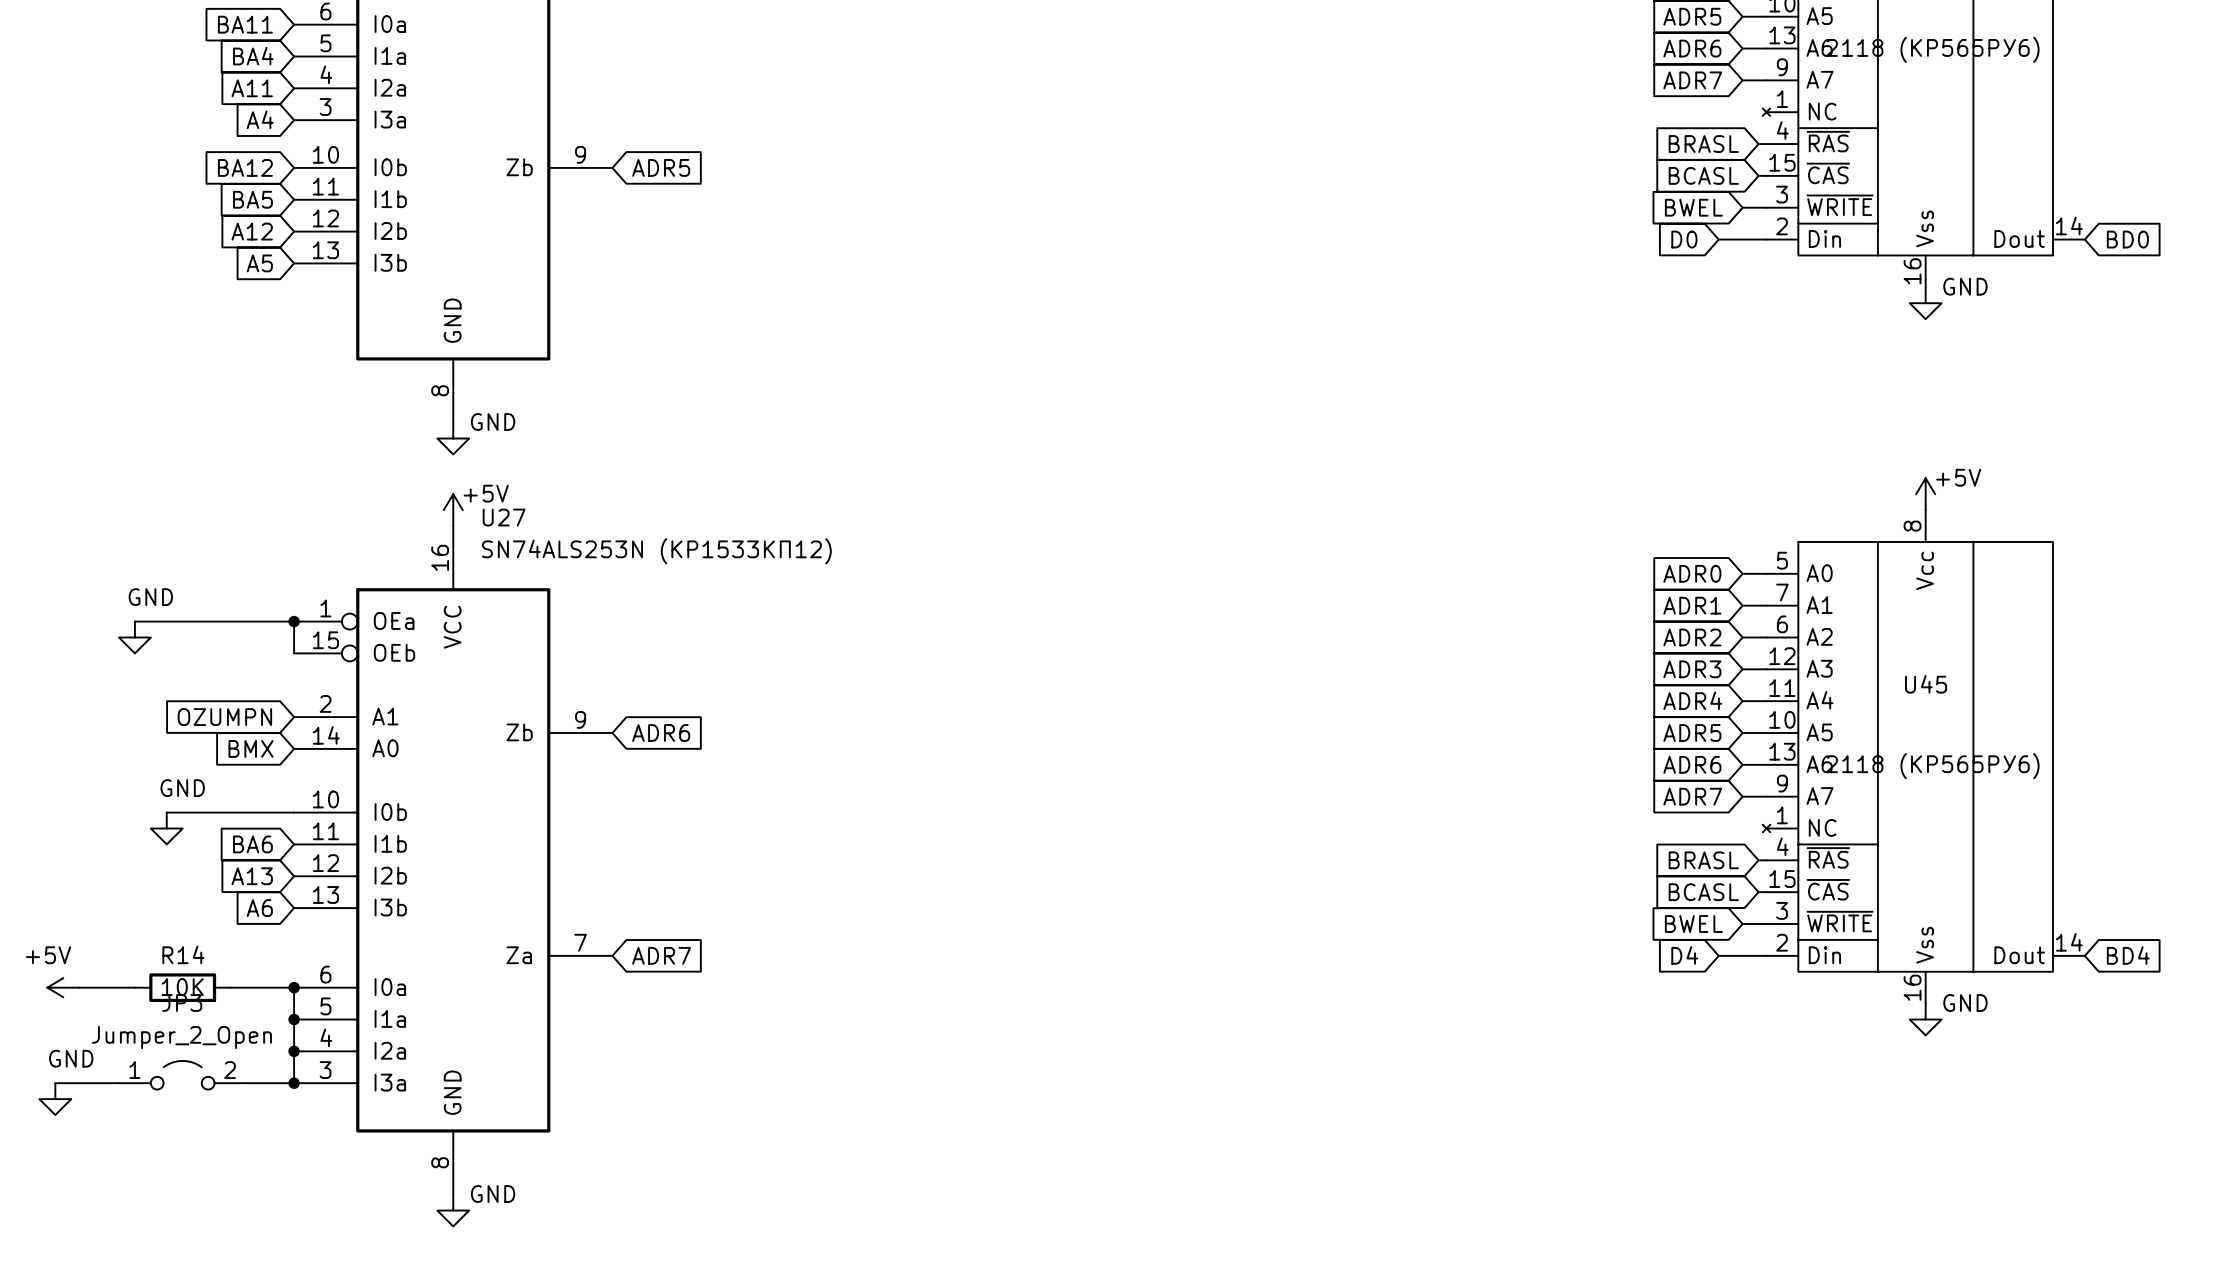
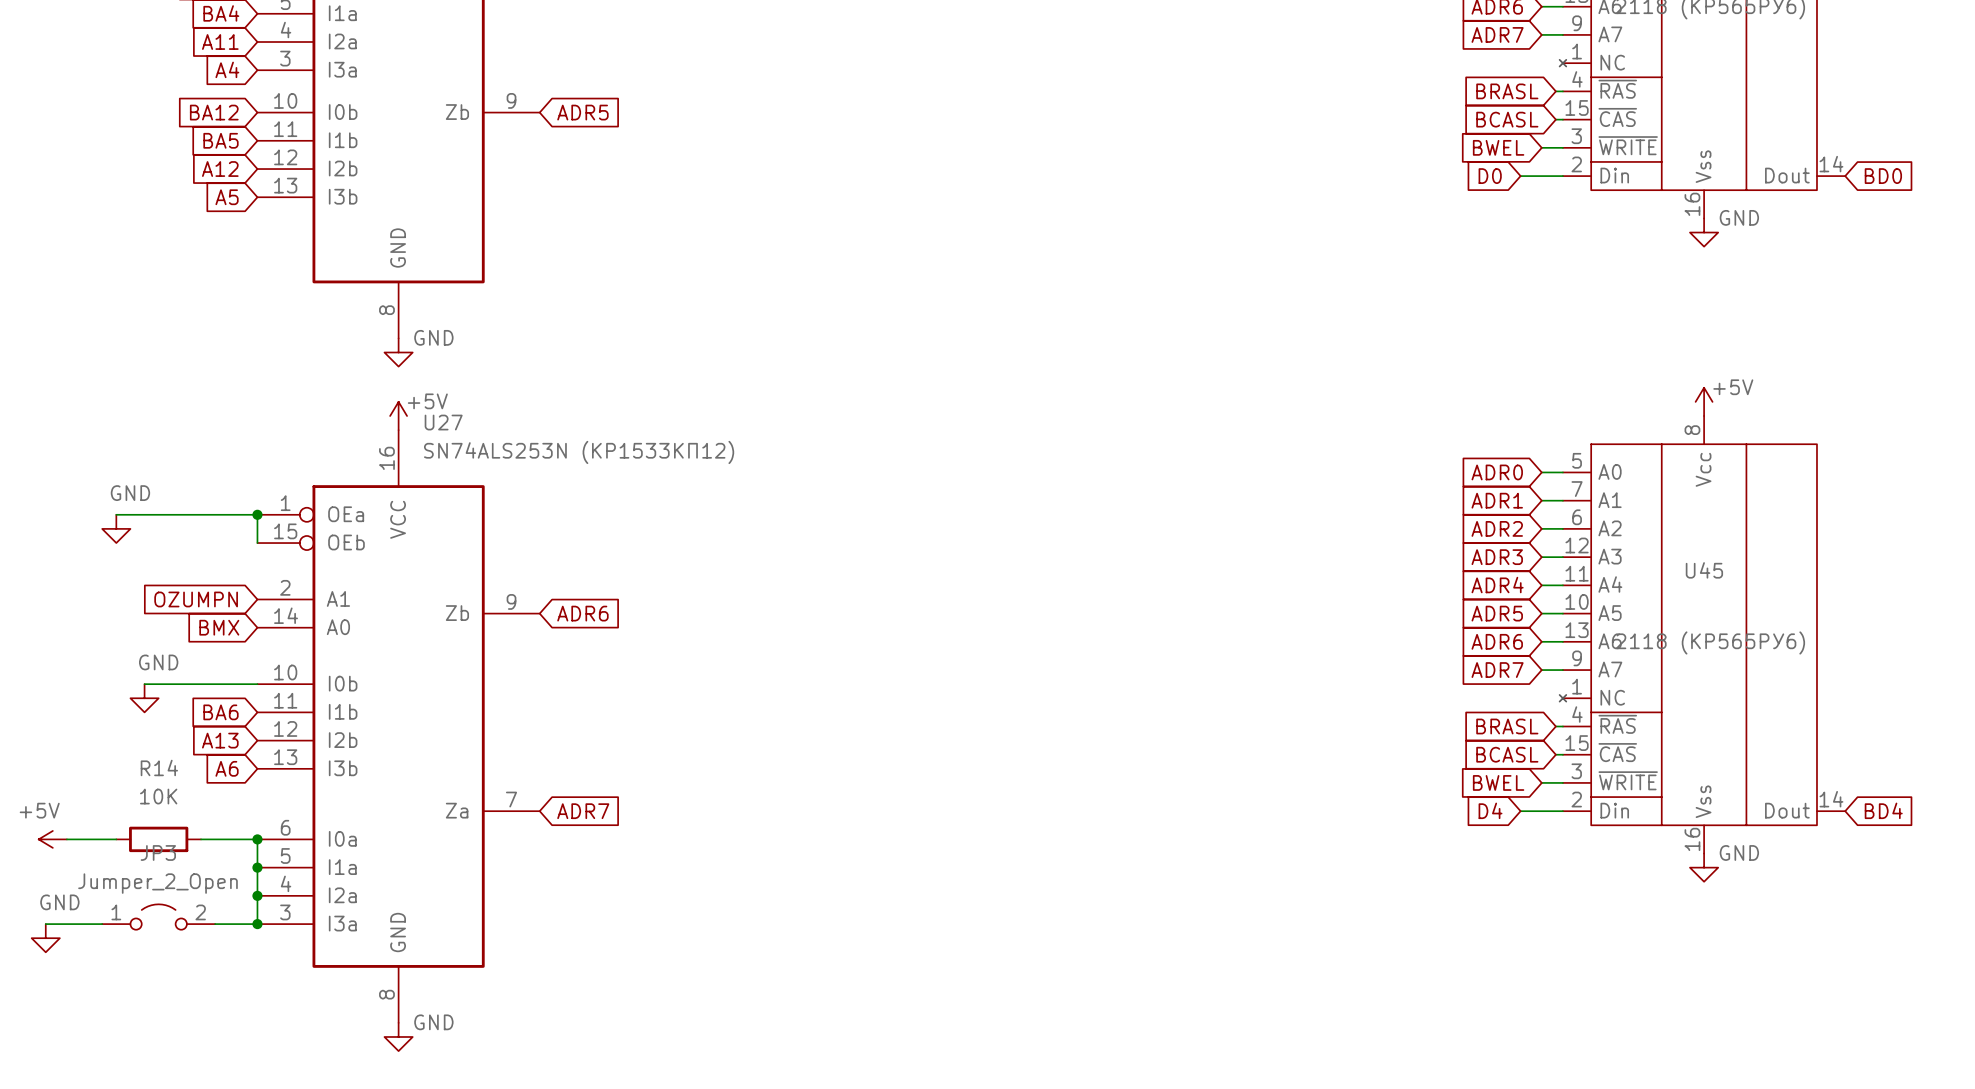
R14 name position: R14 (183, 954) -> R14 (159, 767)
R14 value position: 10K (182, 987) -> 10K (158, 796)

